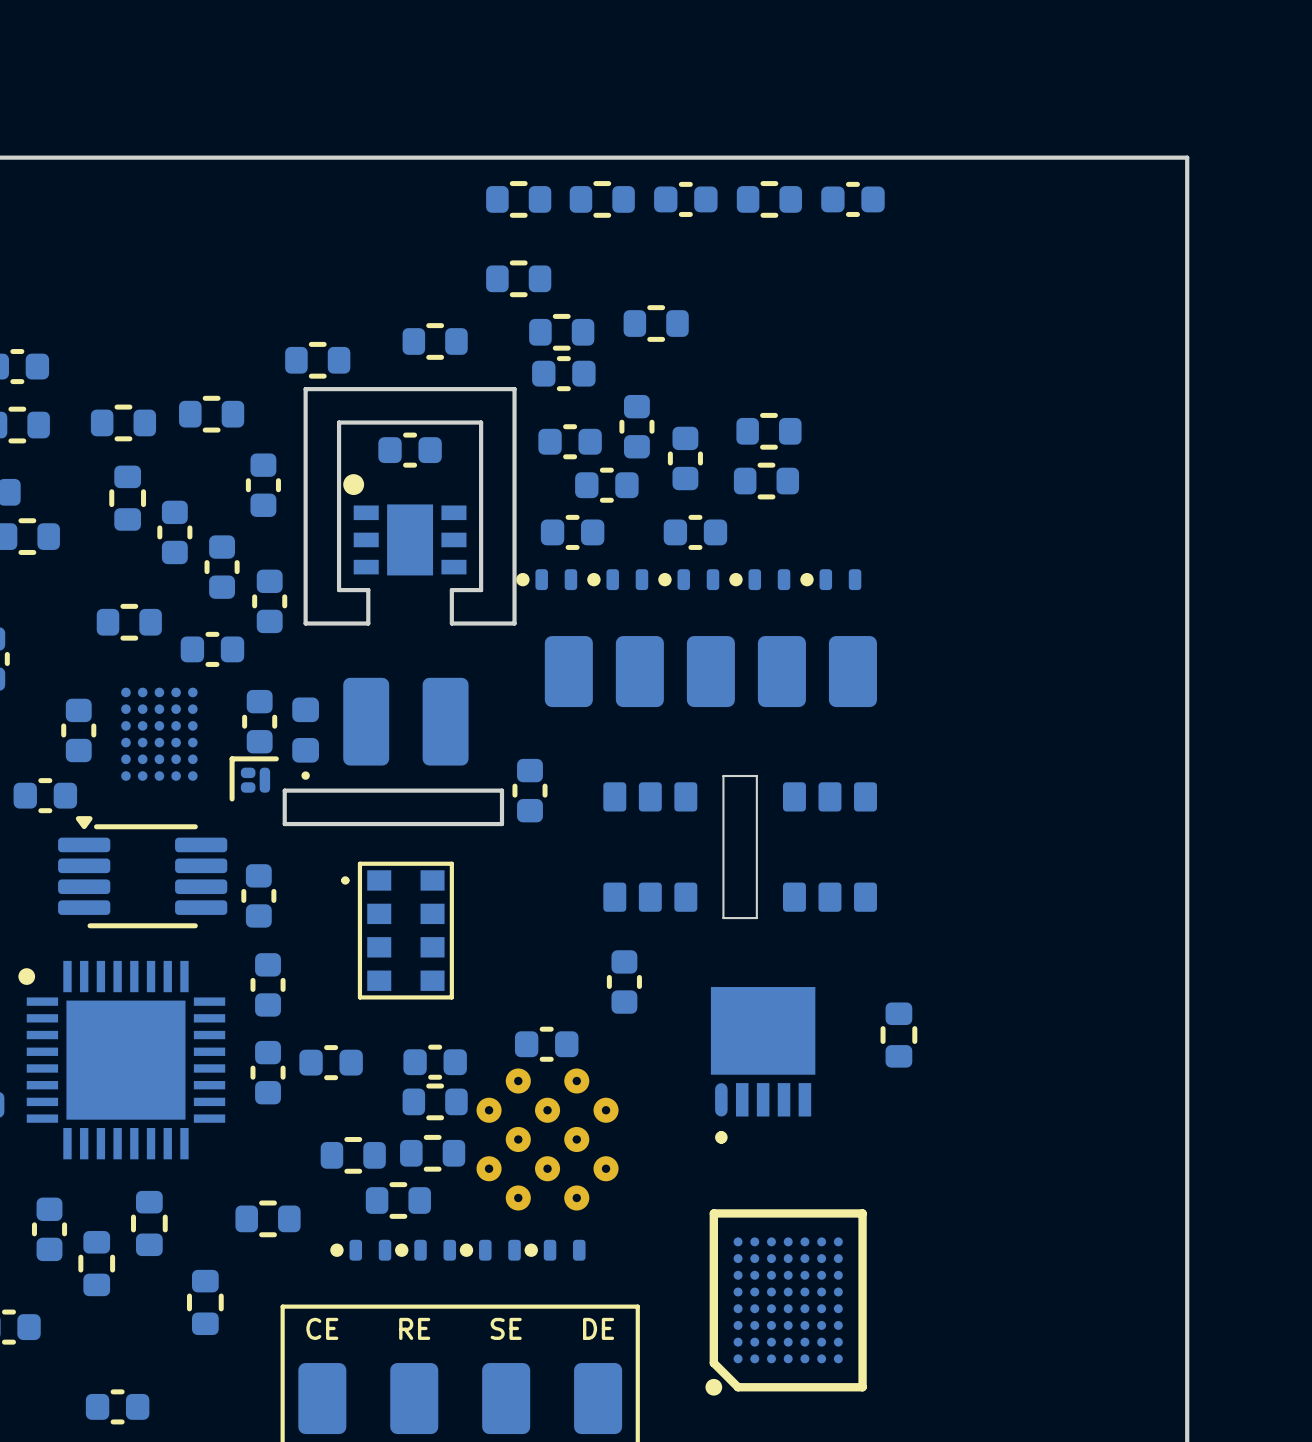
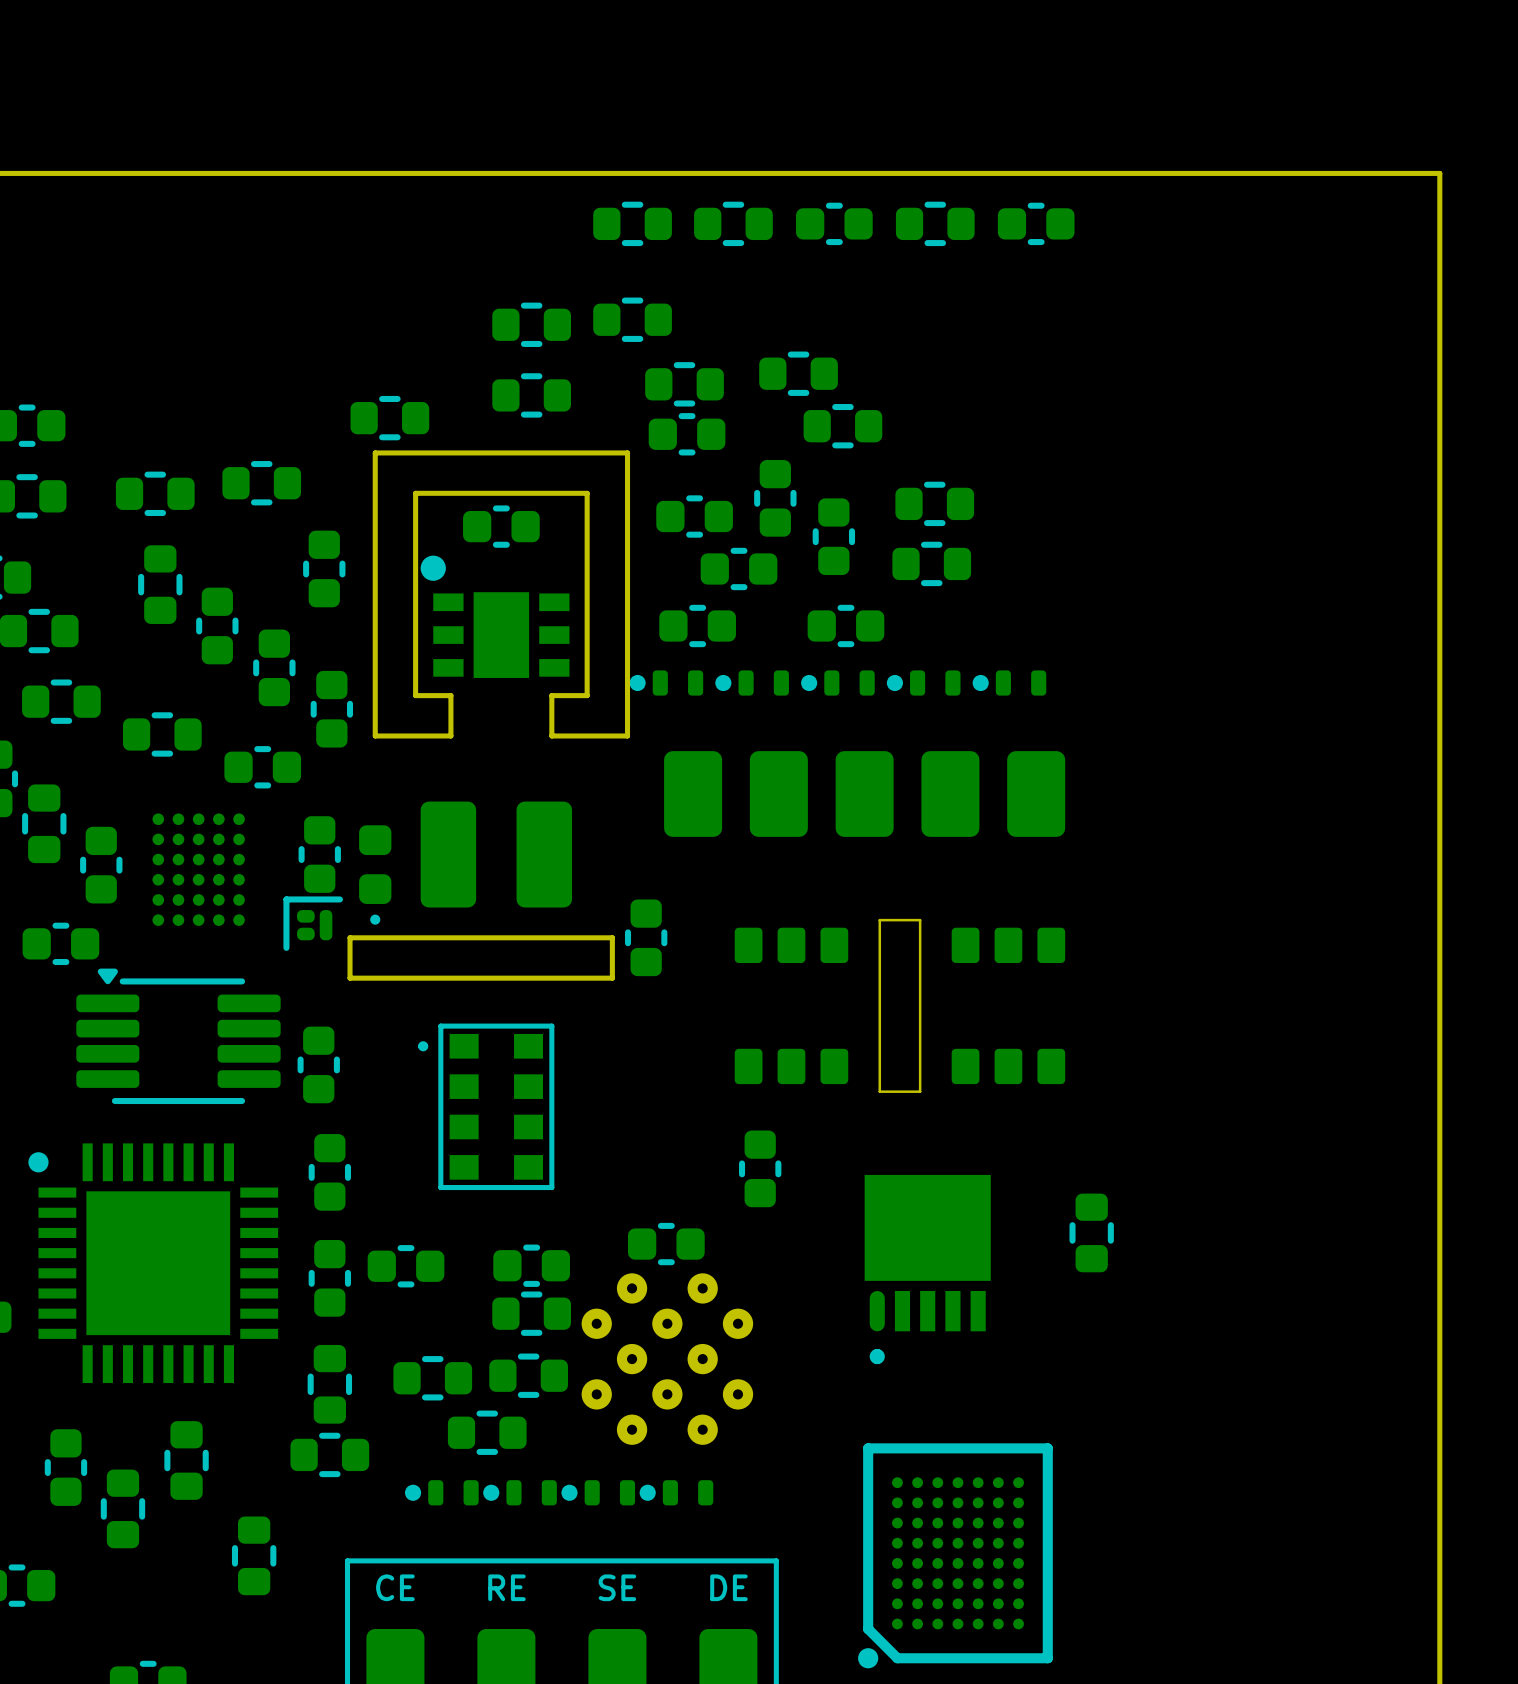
part: none -> (531, 324)
part: none -> (842, 426)
part: none -> (61, 701)
part: none -> (44, 823)
part: none -> (329, 1384)

